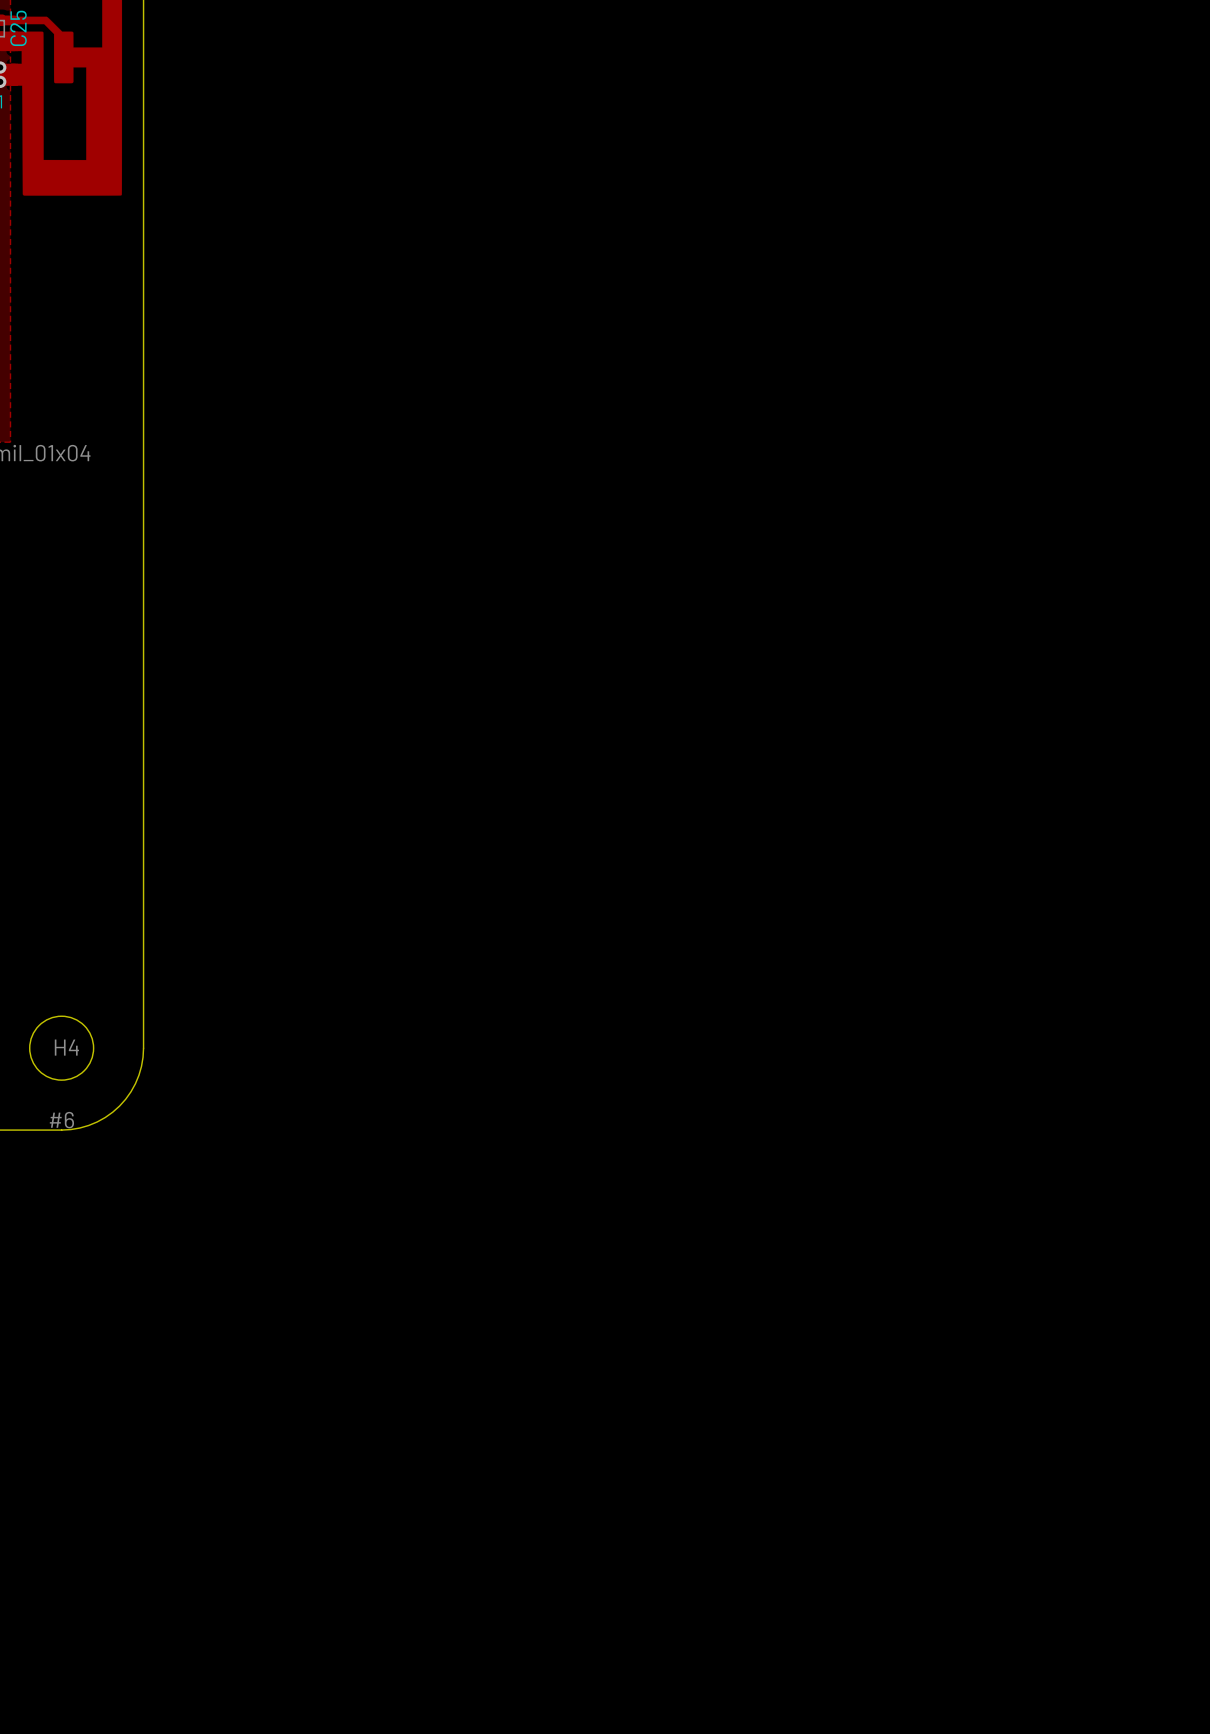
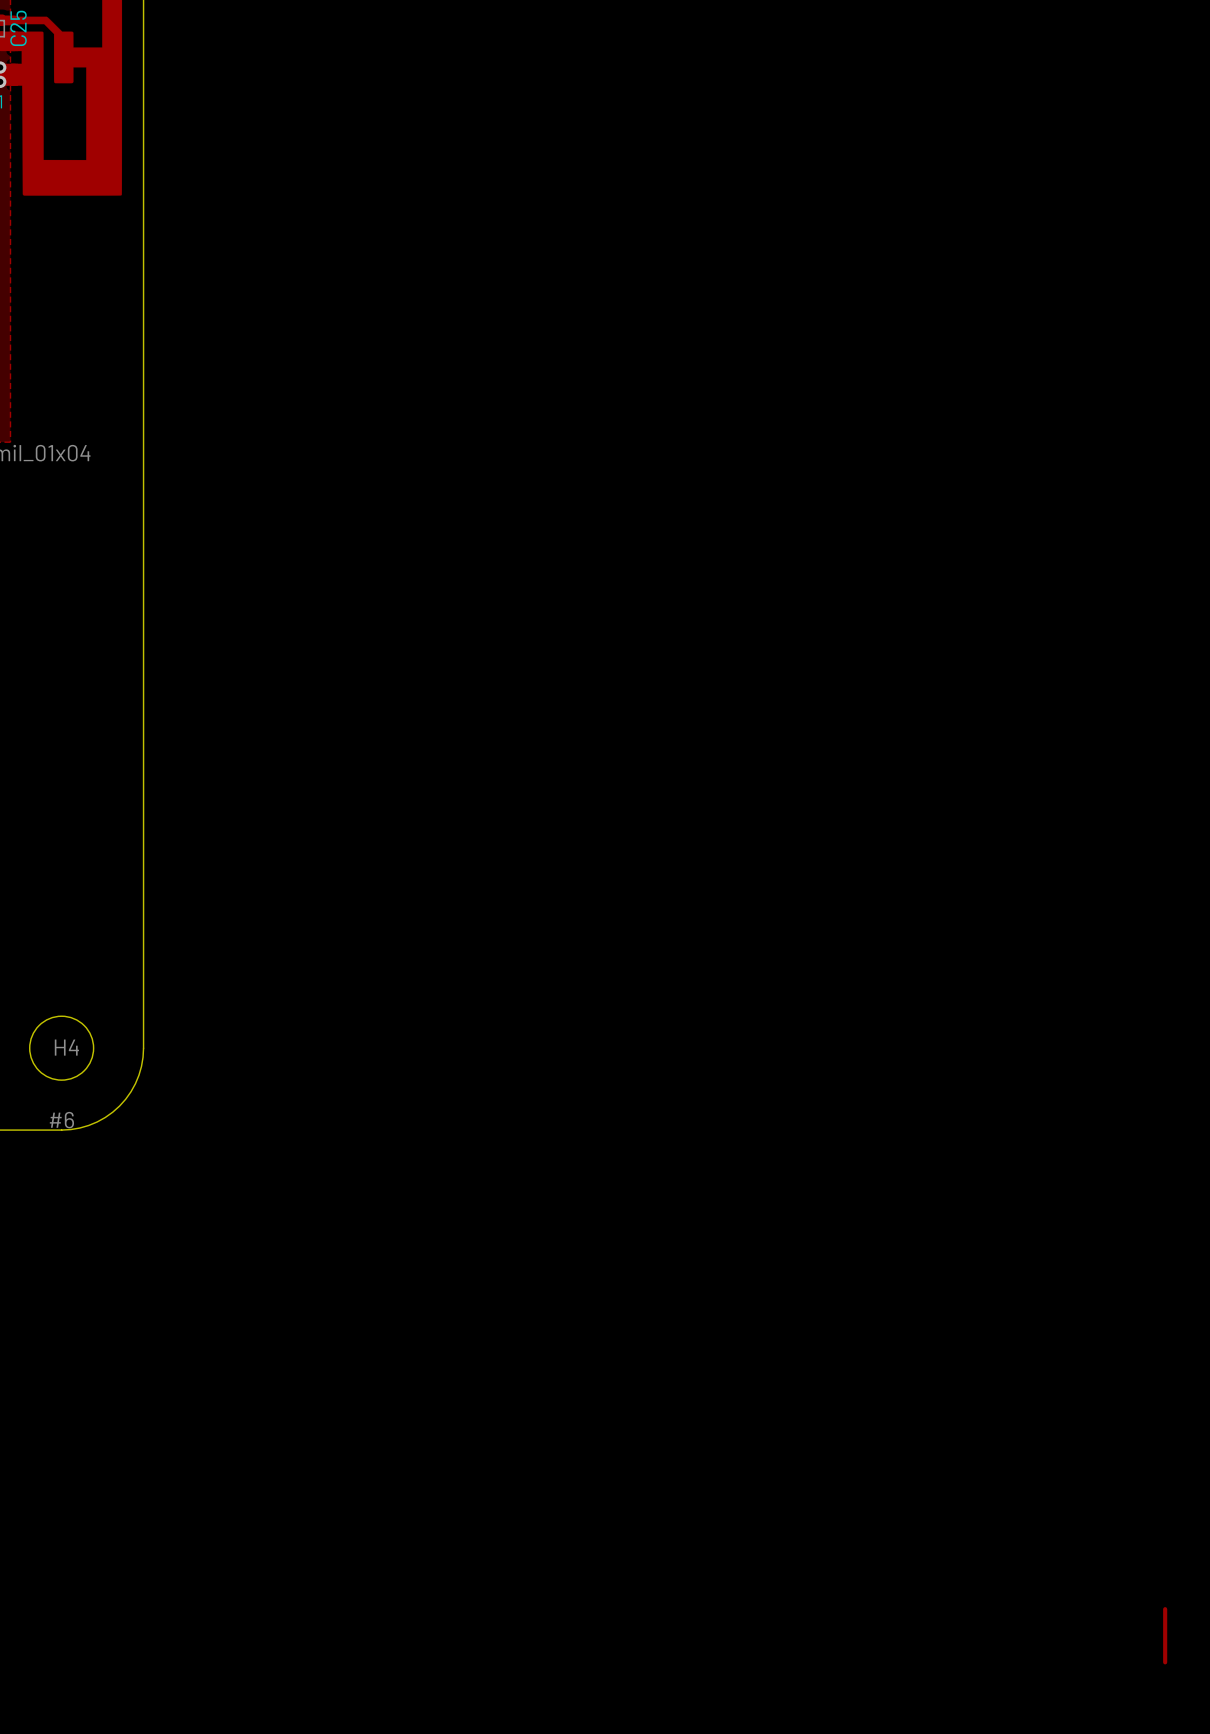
track: none -> (1165, 1609) (1165, 1662)

